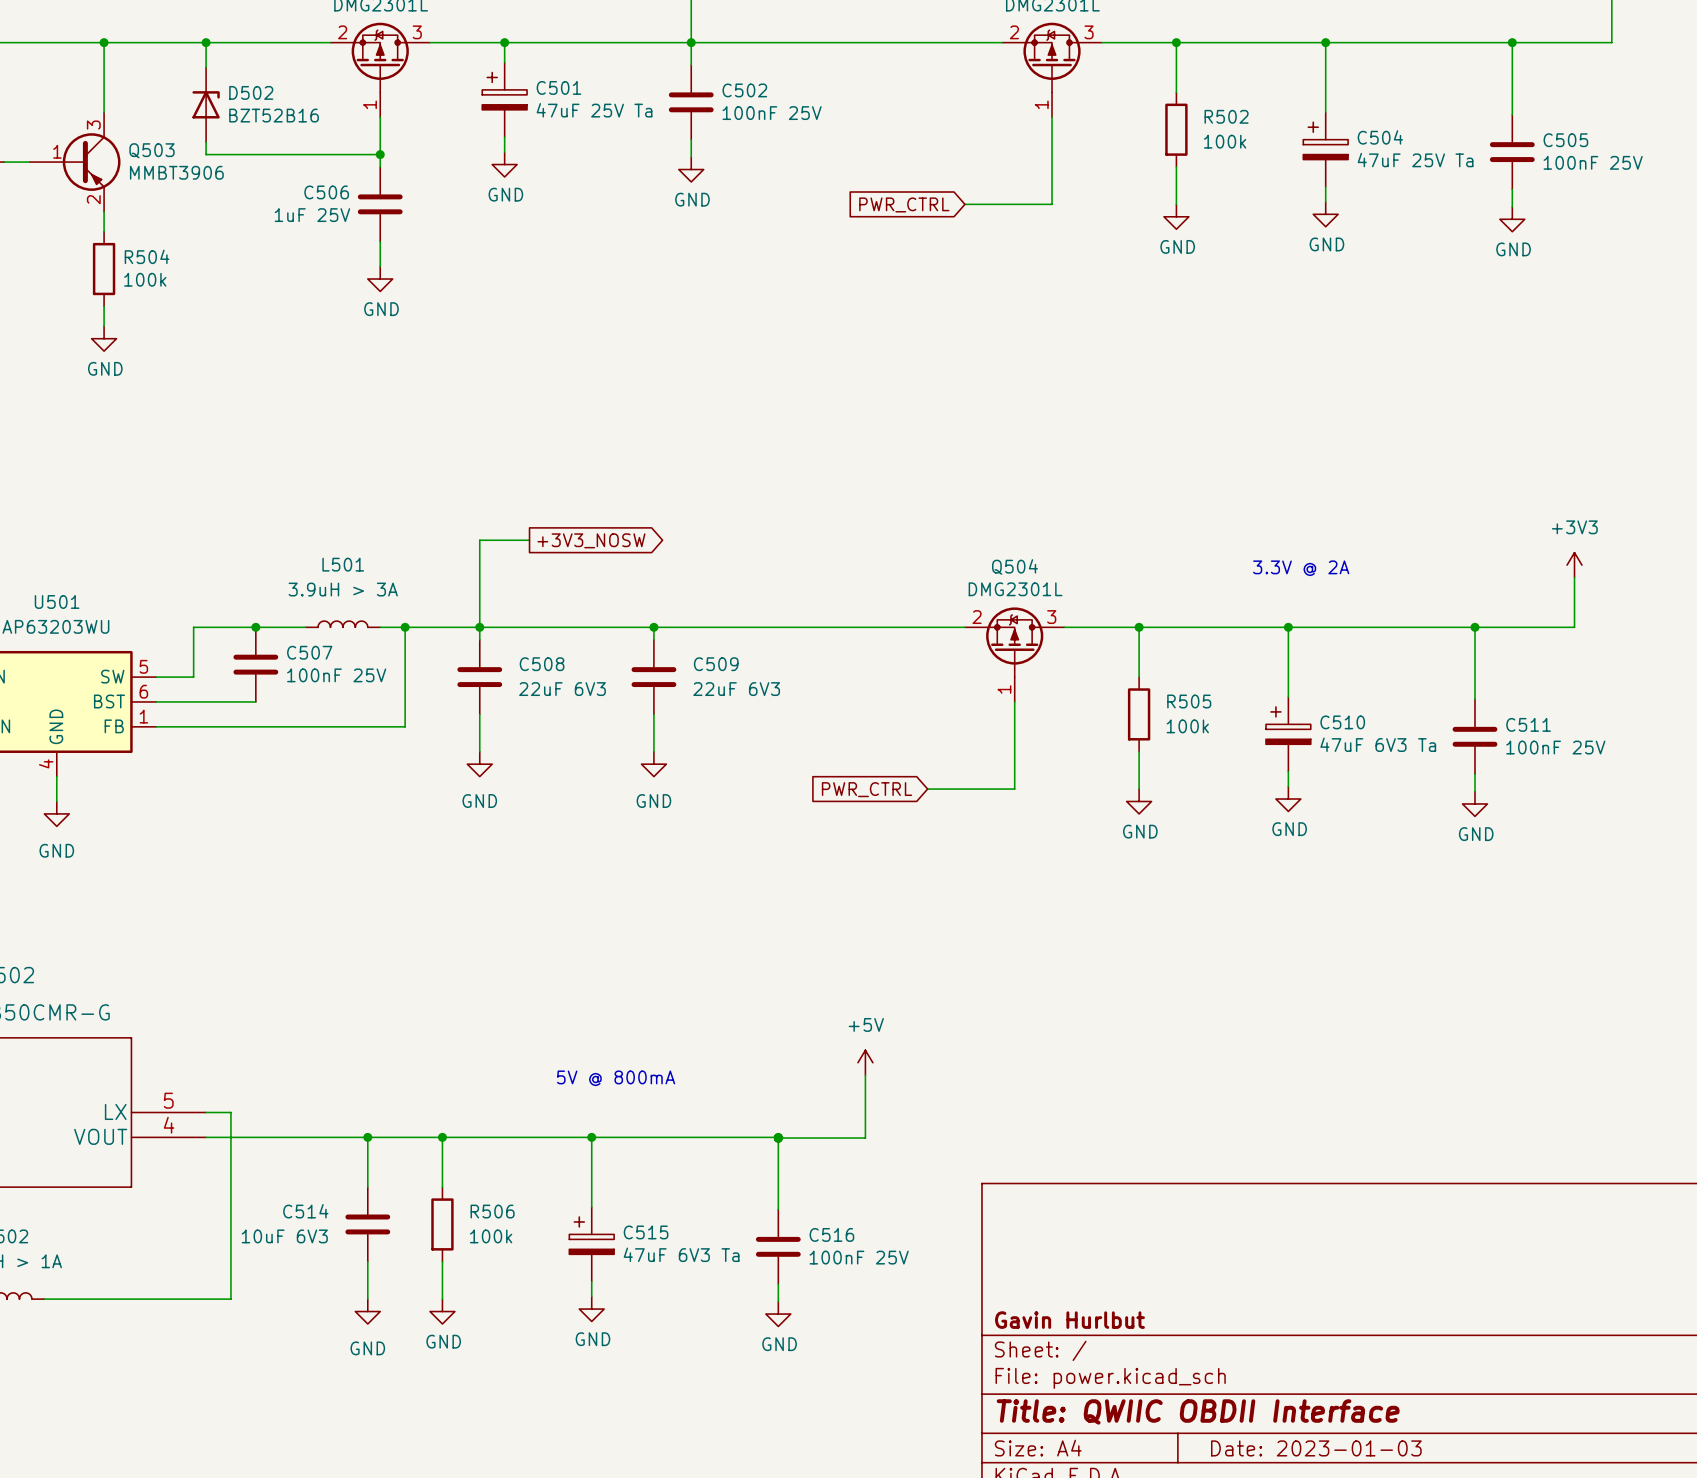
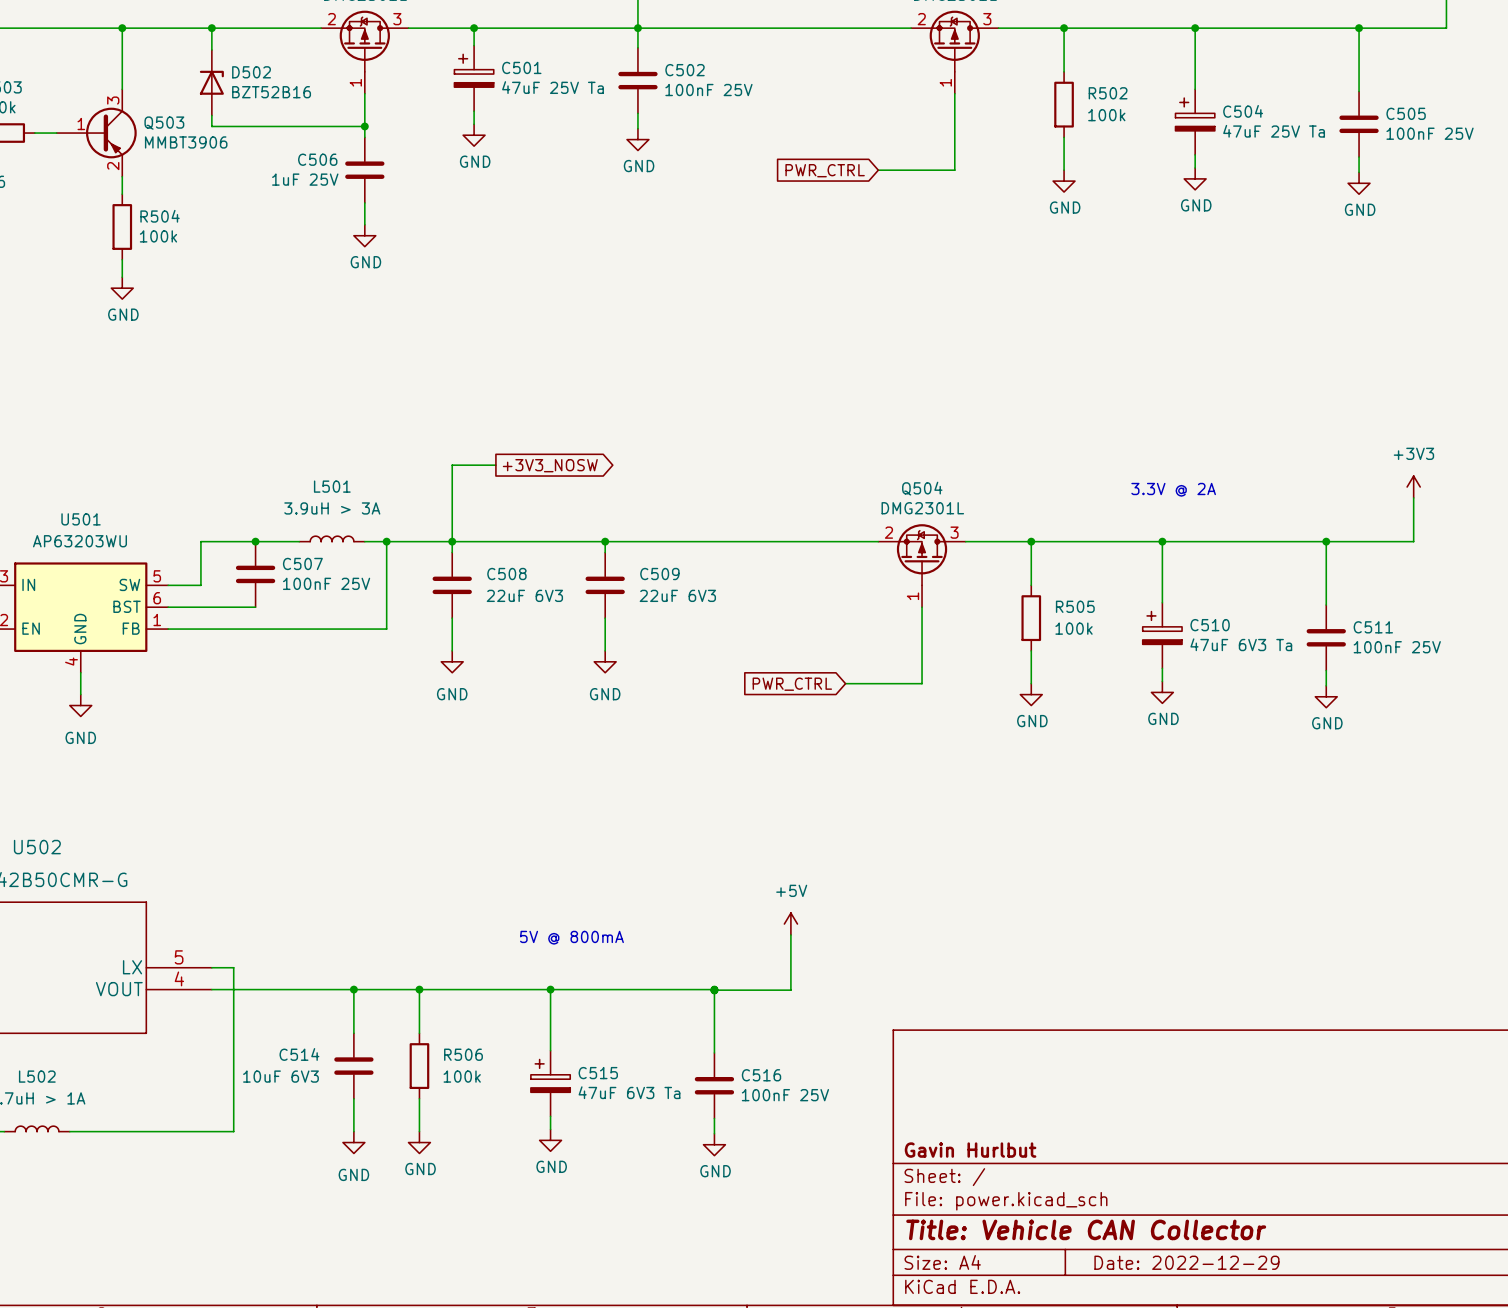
title block: Title: QWIIC OBDII Interface (1198, 1411) -> Title: Vehicle CAN Collector (1086, 1229)
title block: Date: 2023-01-03 (1316, 1448) -> Date: 2022-12-29 (1186, 1262)

